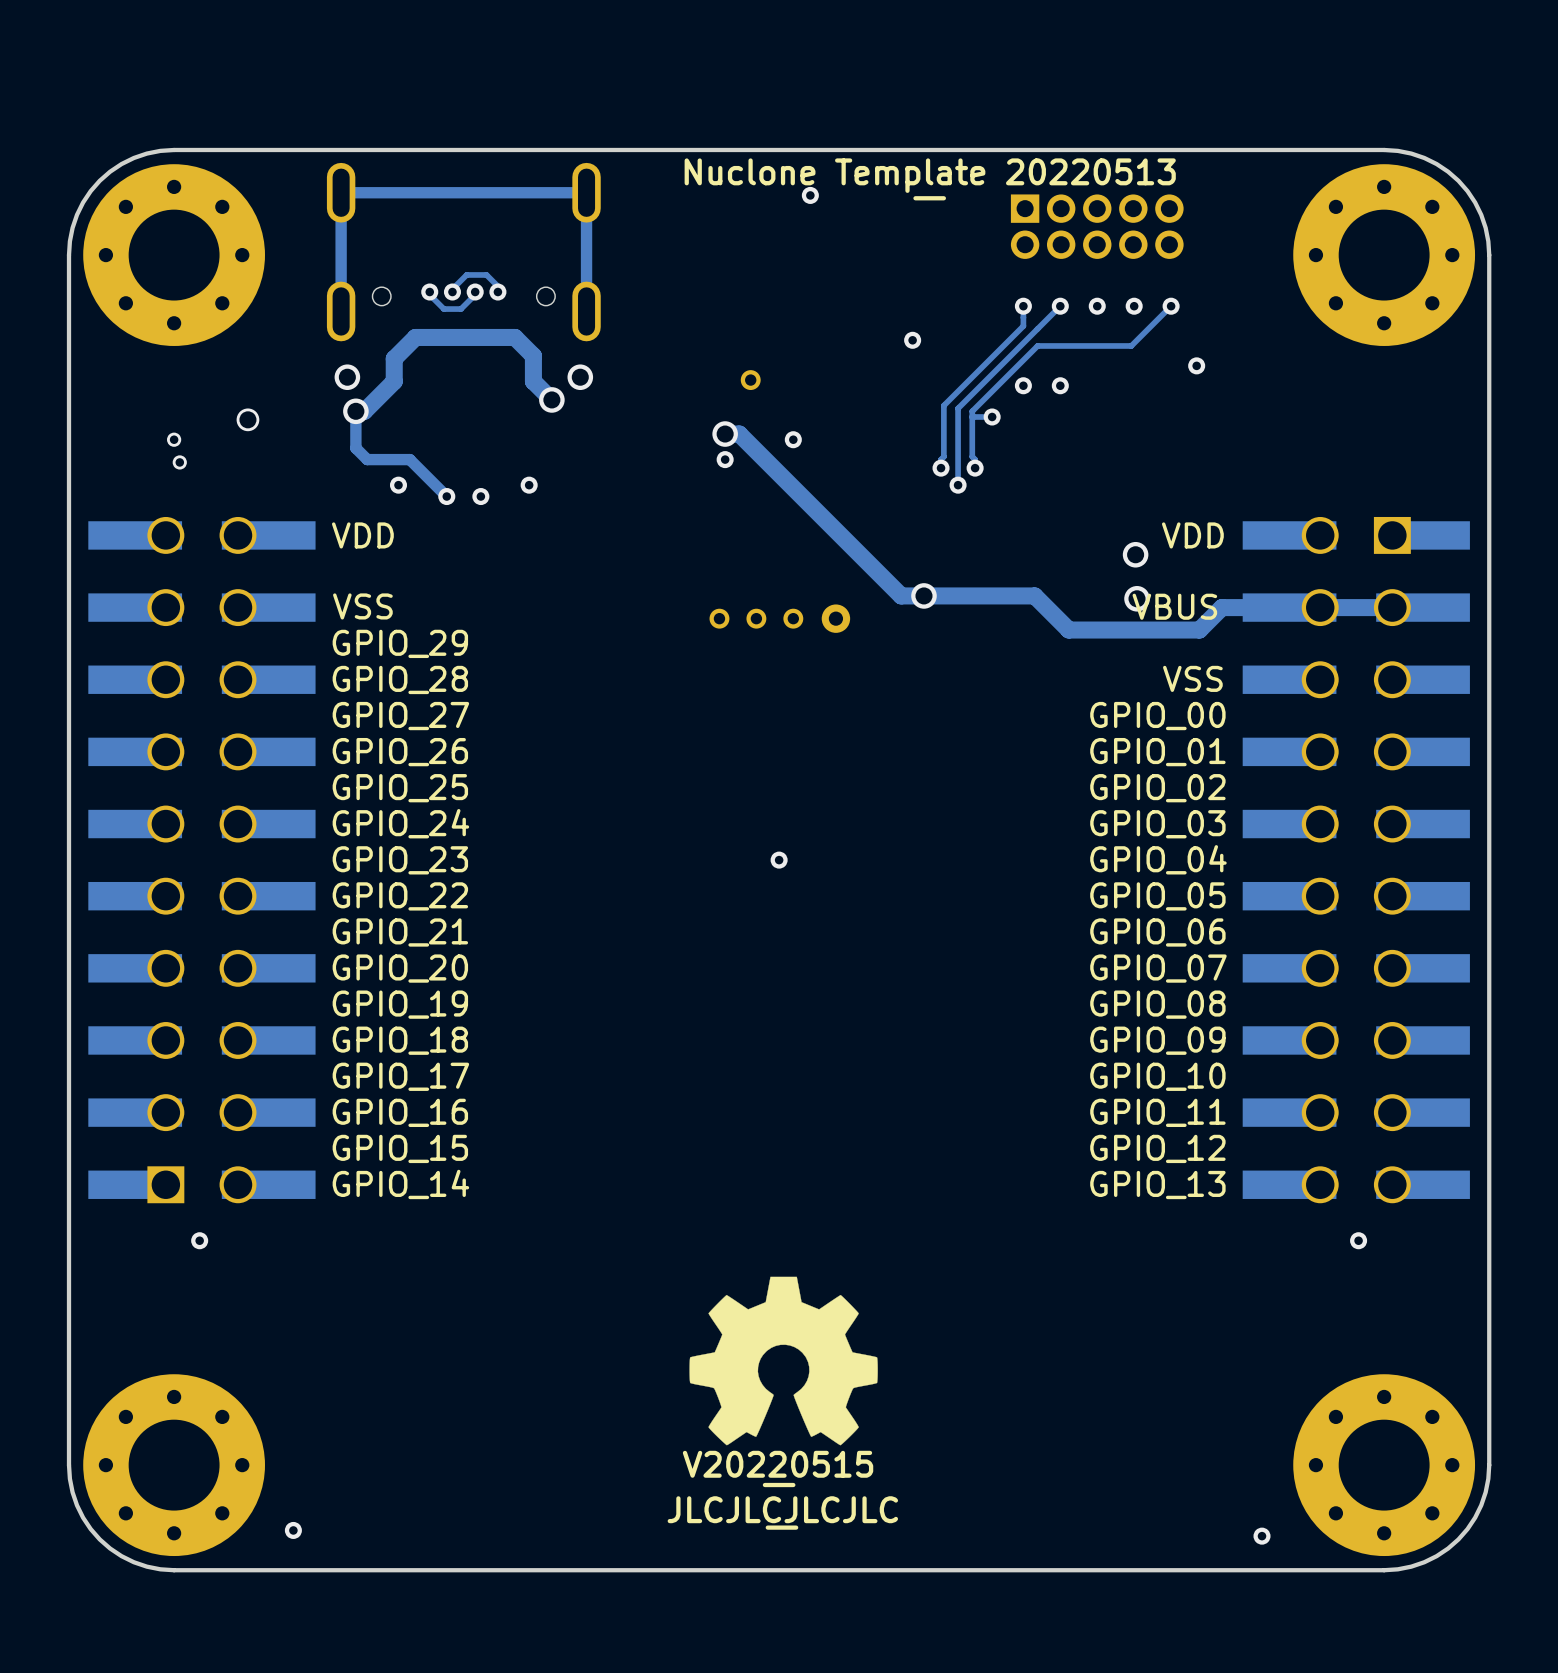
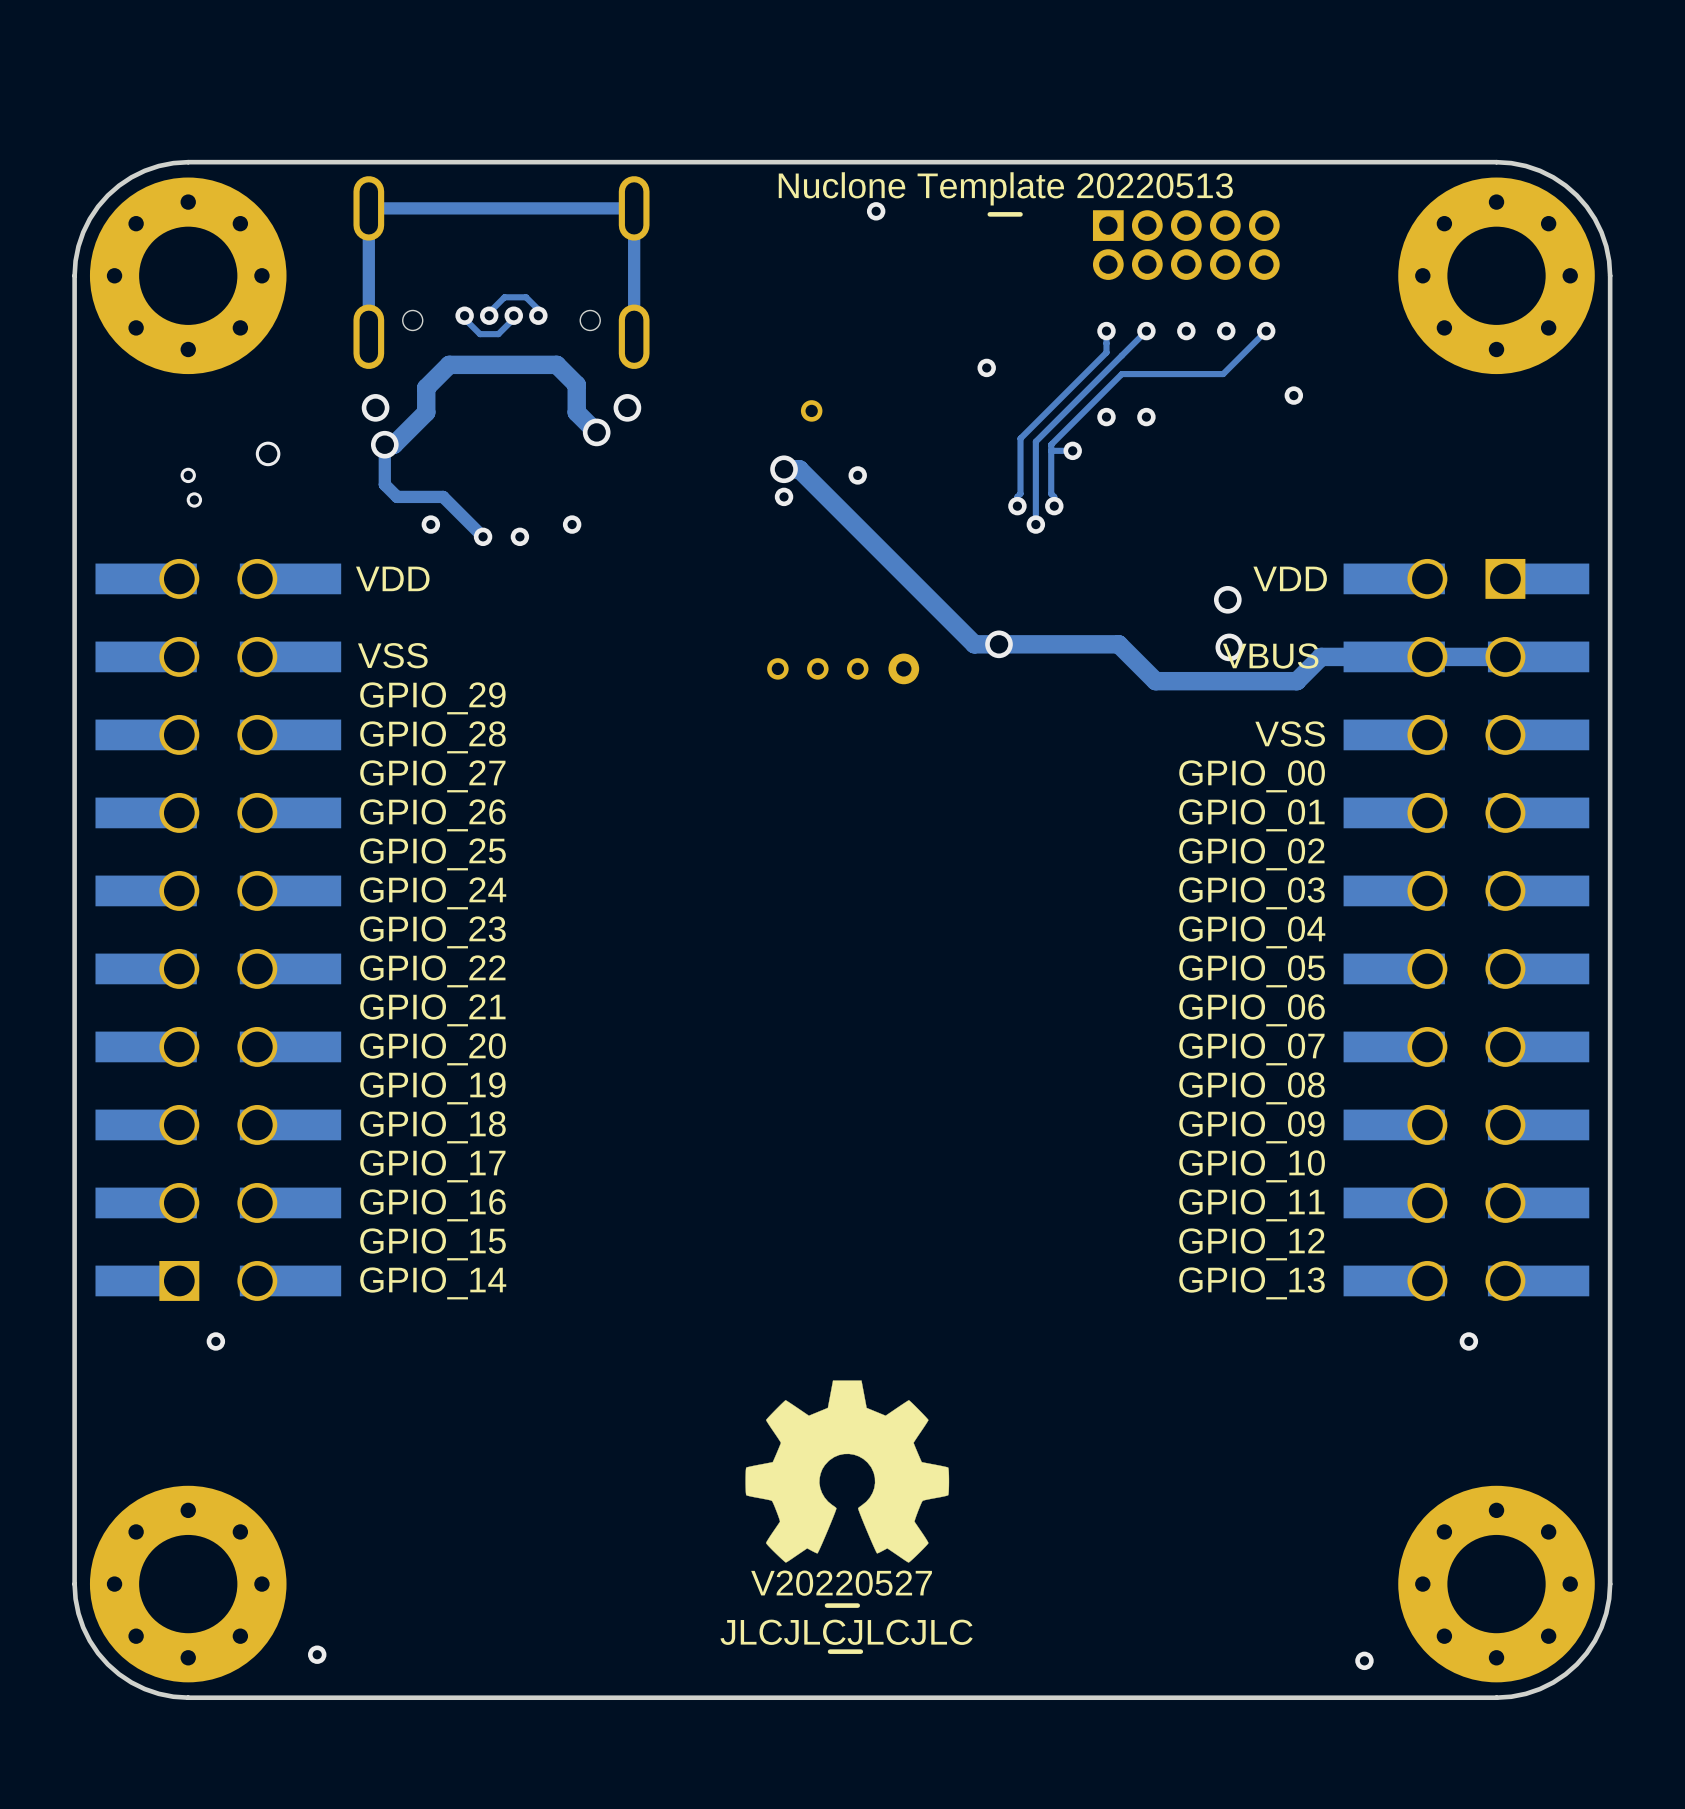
via: (779, 860) -> none
drawing shape: [682, 1450, 874, 1488] -> [751, 1570, 932, 1608]

